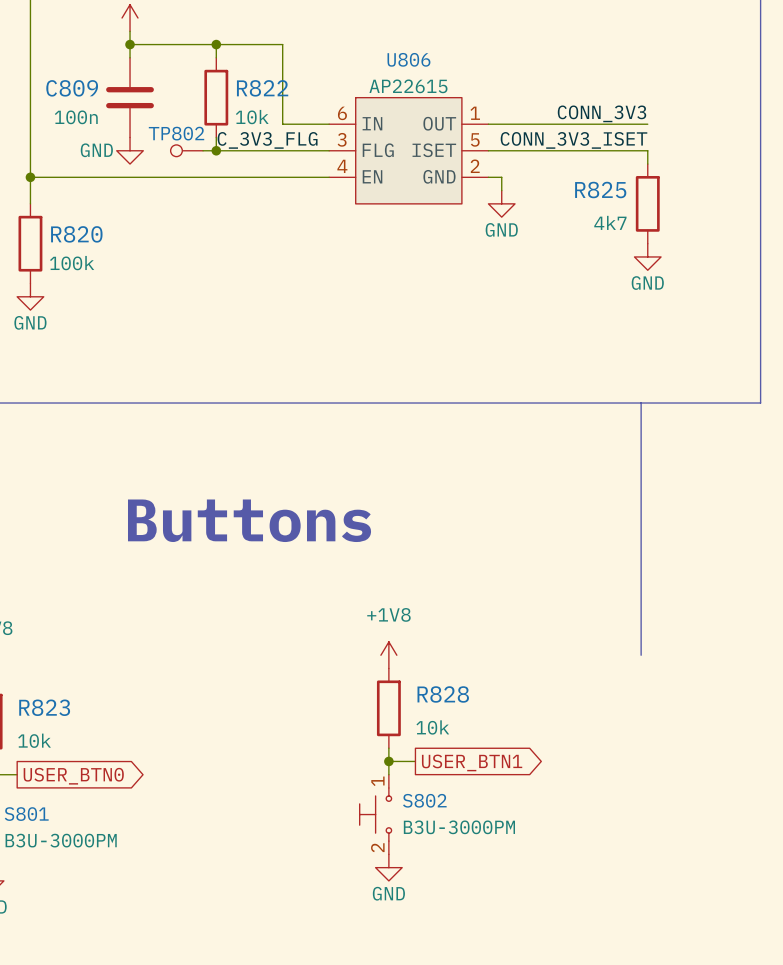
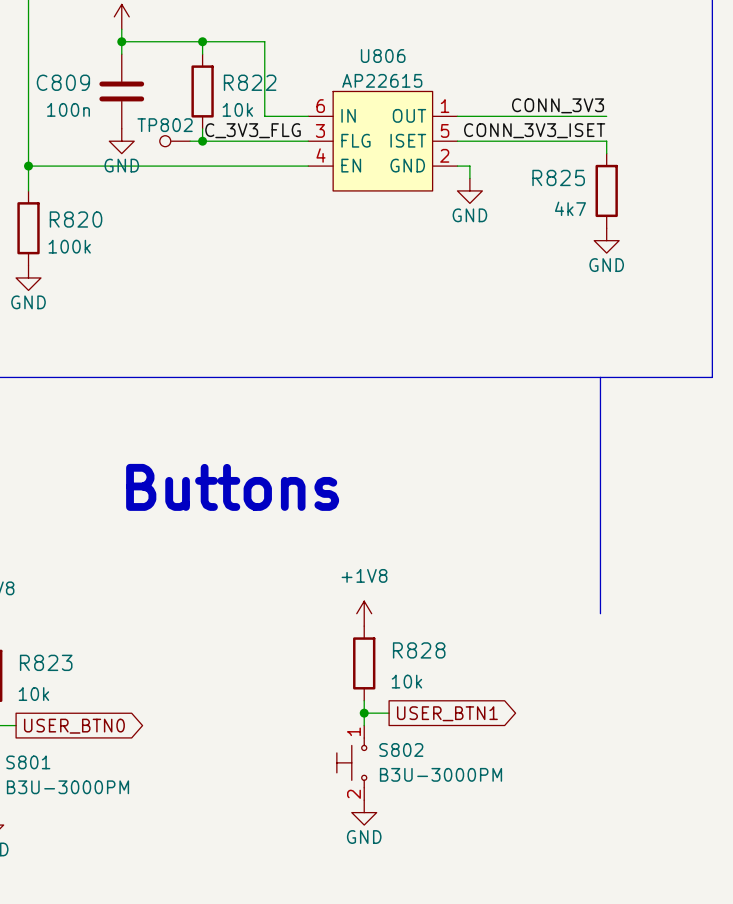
power symbol text position: GND (96, 150) -> GND (121, 165)

